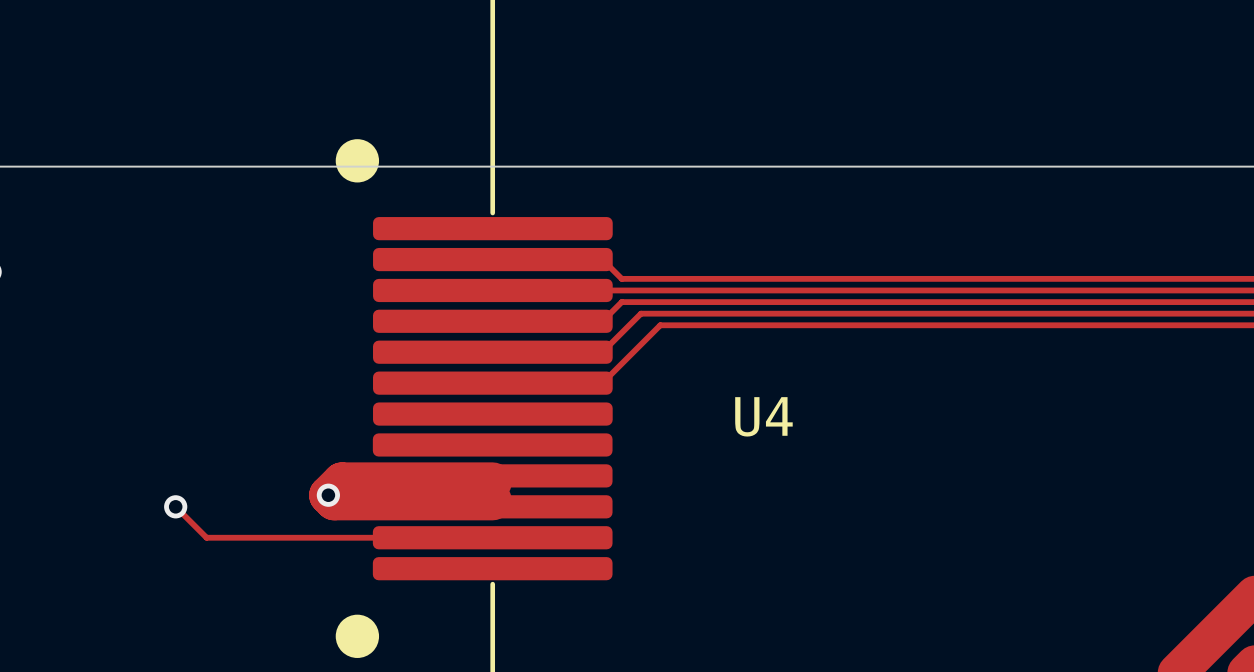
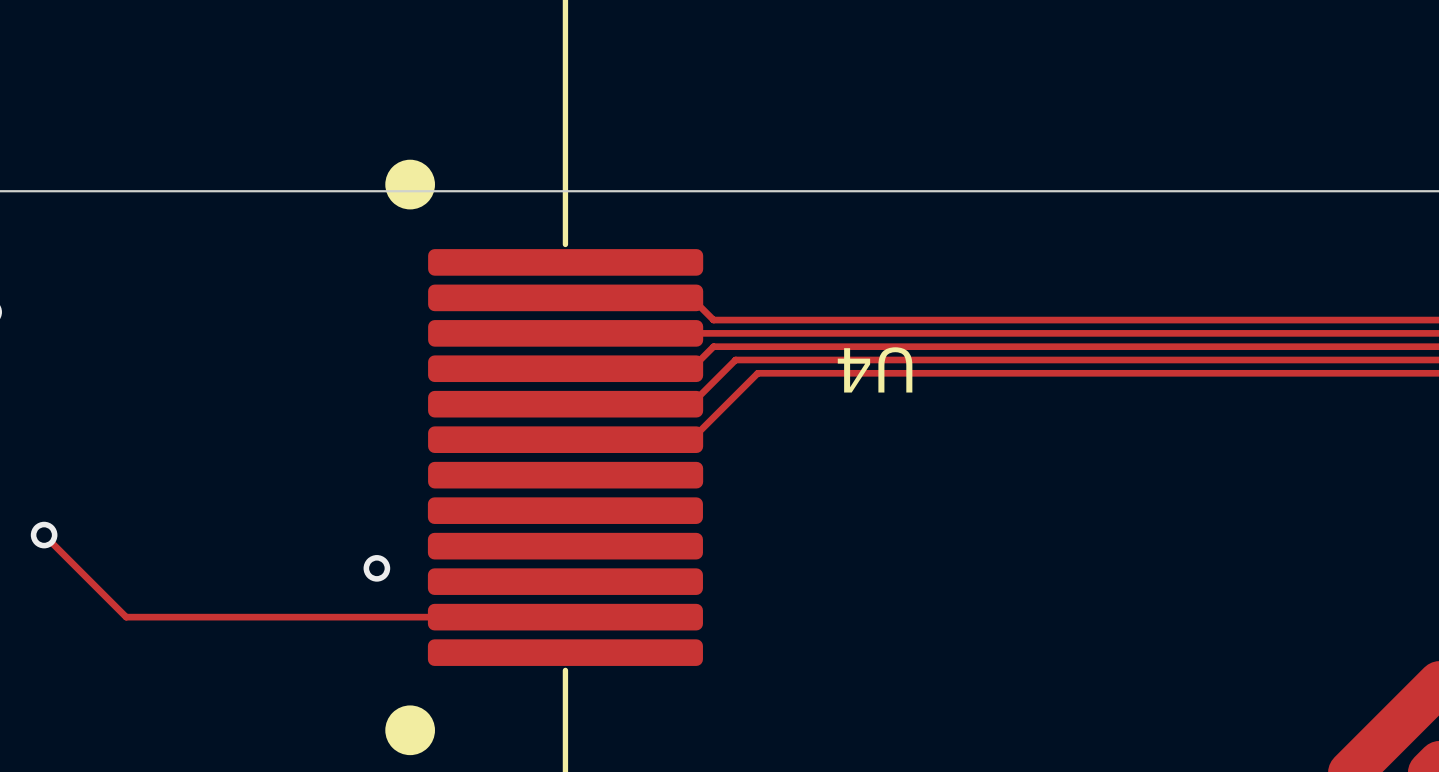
U4 name rotation: 0° (763, 416) -> 180° (875, 369)
U4 name position: U4 (763, 416) -> U4 (875, 369)
track: (492, 481) (341, 481) (328, 495) (334, 501) (492, 501) -> none
track: (175, 506) (206, 537) -> (44, 535) (126, 617) (237, 617)
via position: (175, 506) -> (44, 535)

